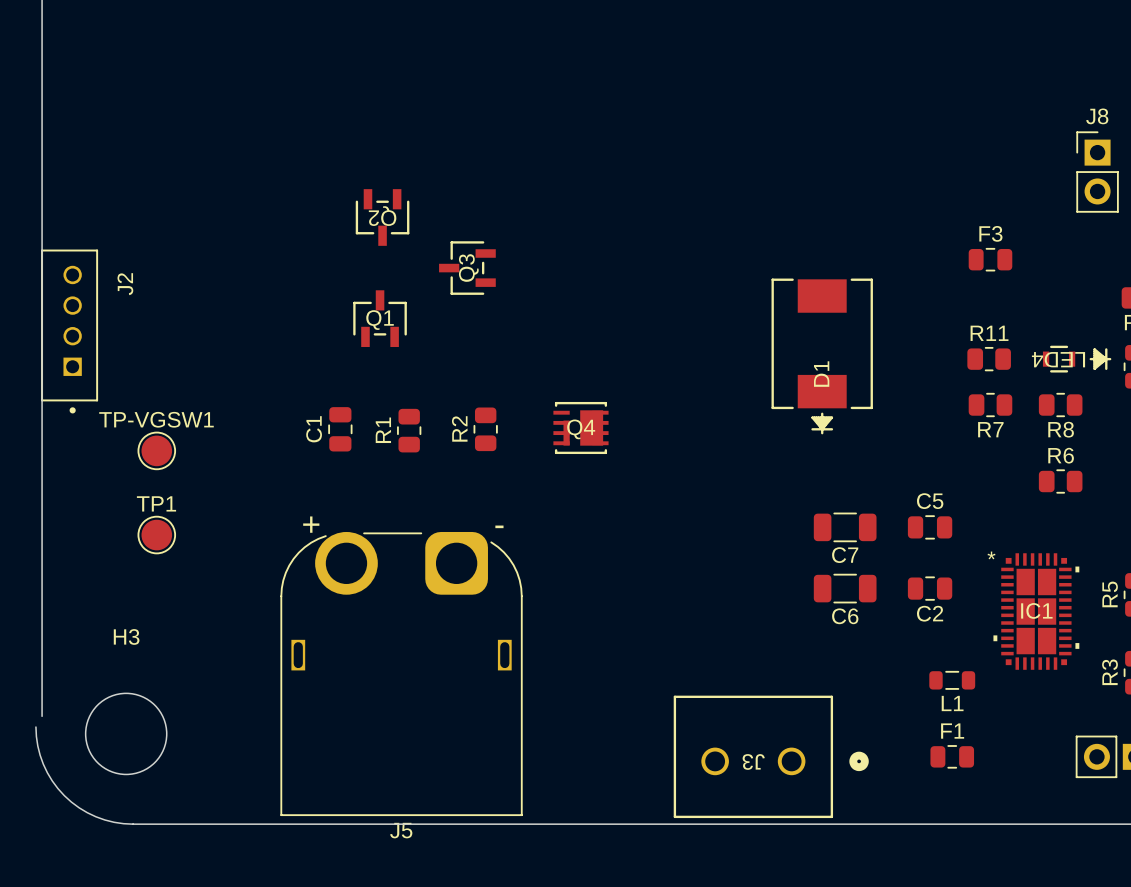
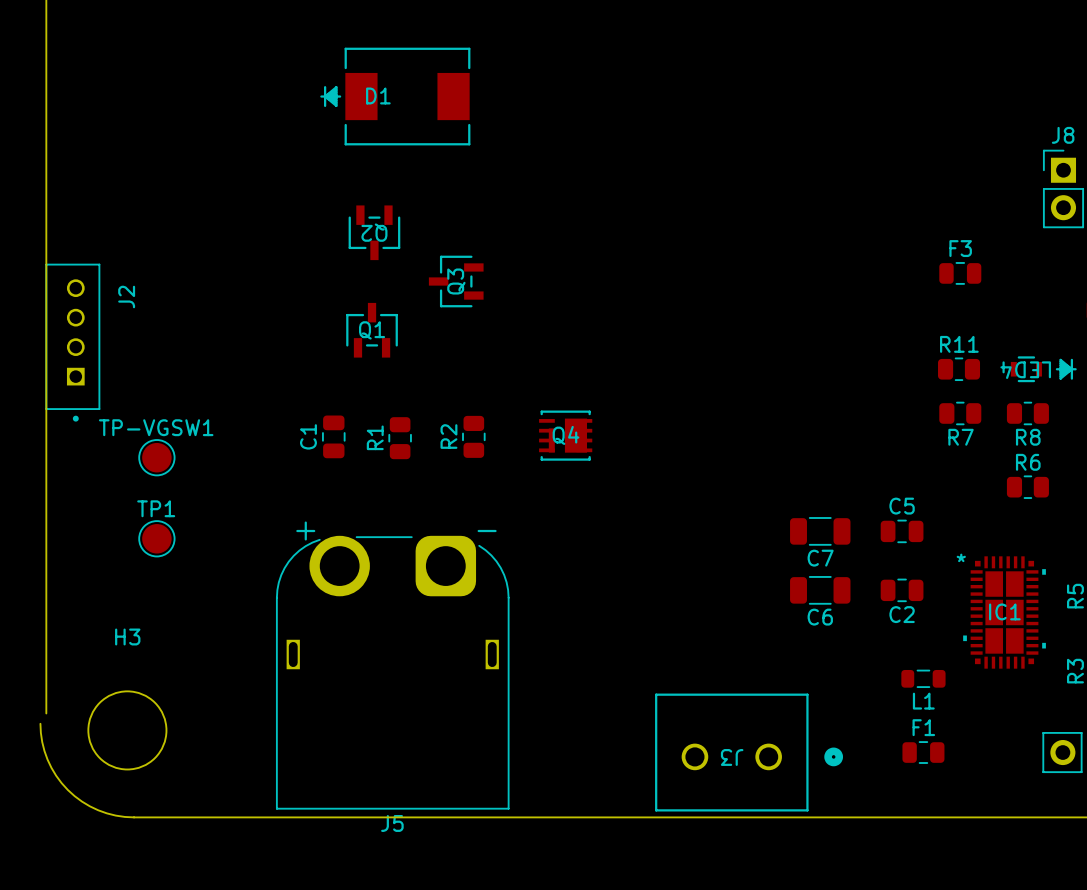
D1 rotation: 0° (822, 356) -> 90° clockwise (395, 96)
D1 position: (822, 356) -> (395, 96)

